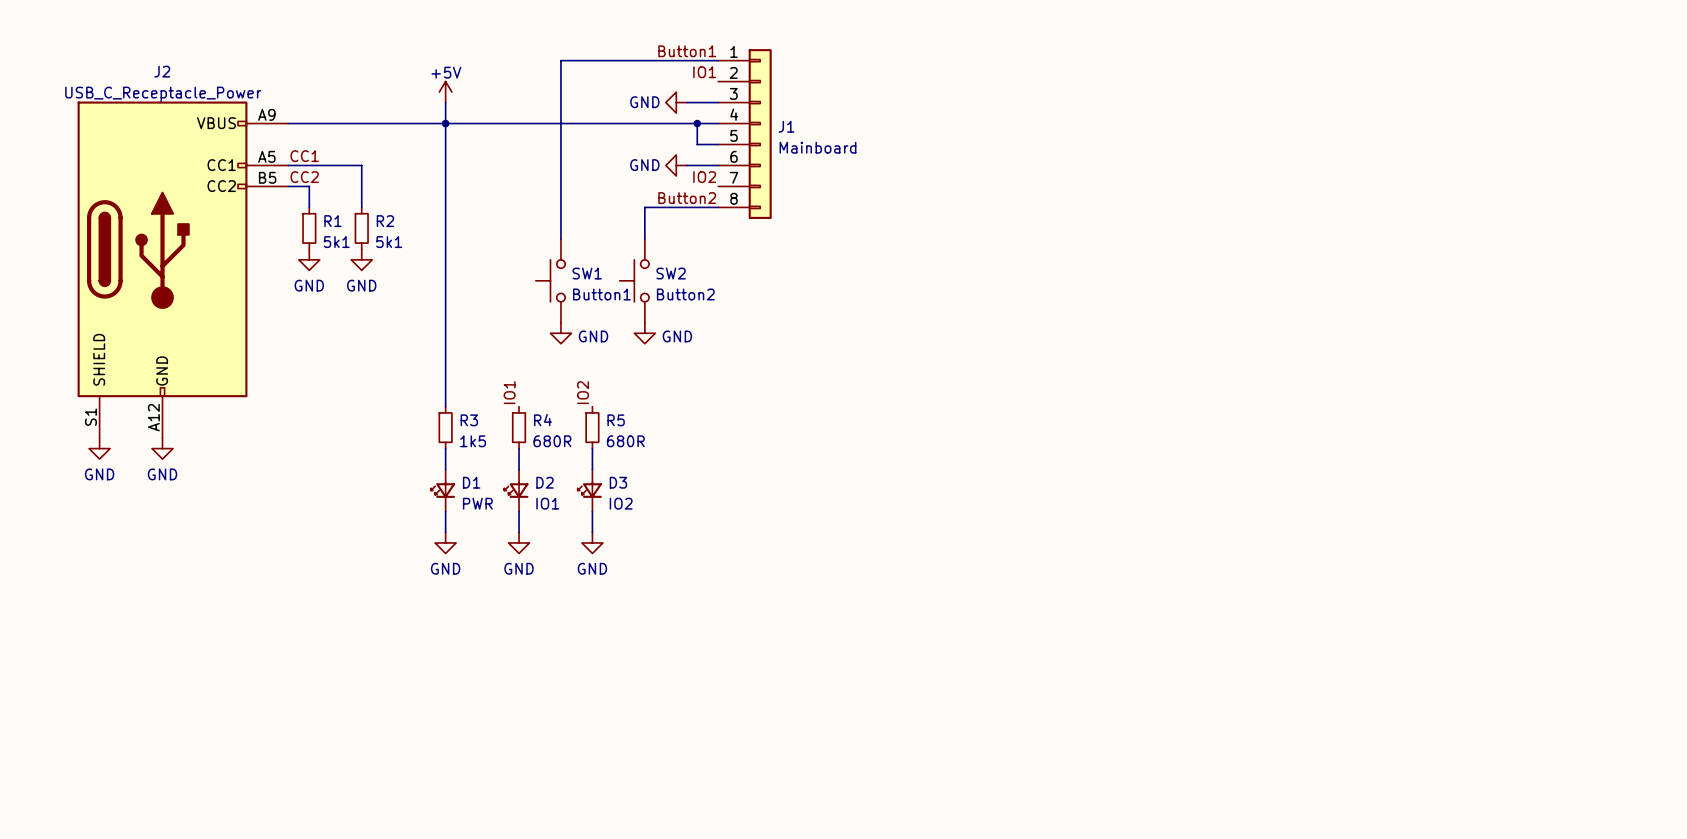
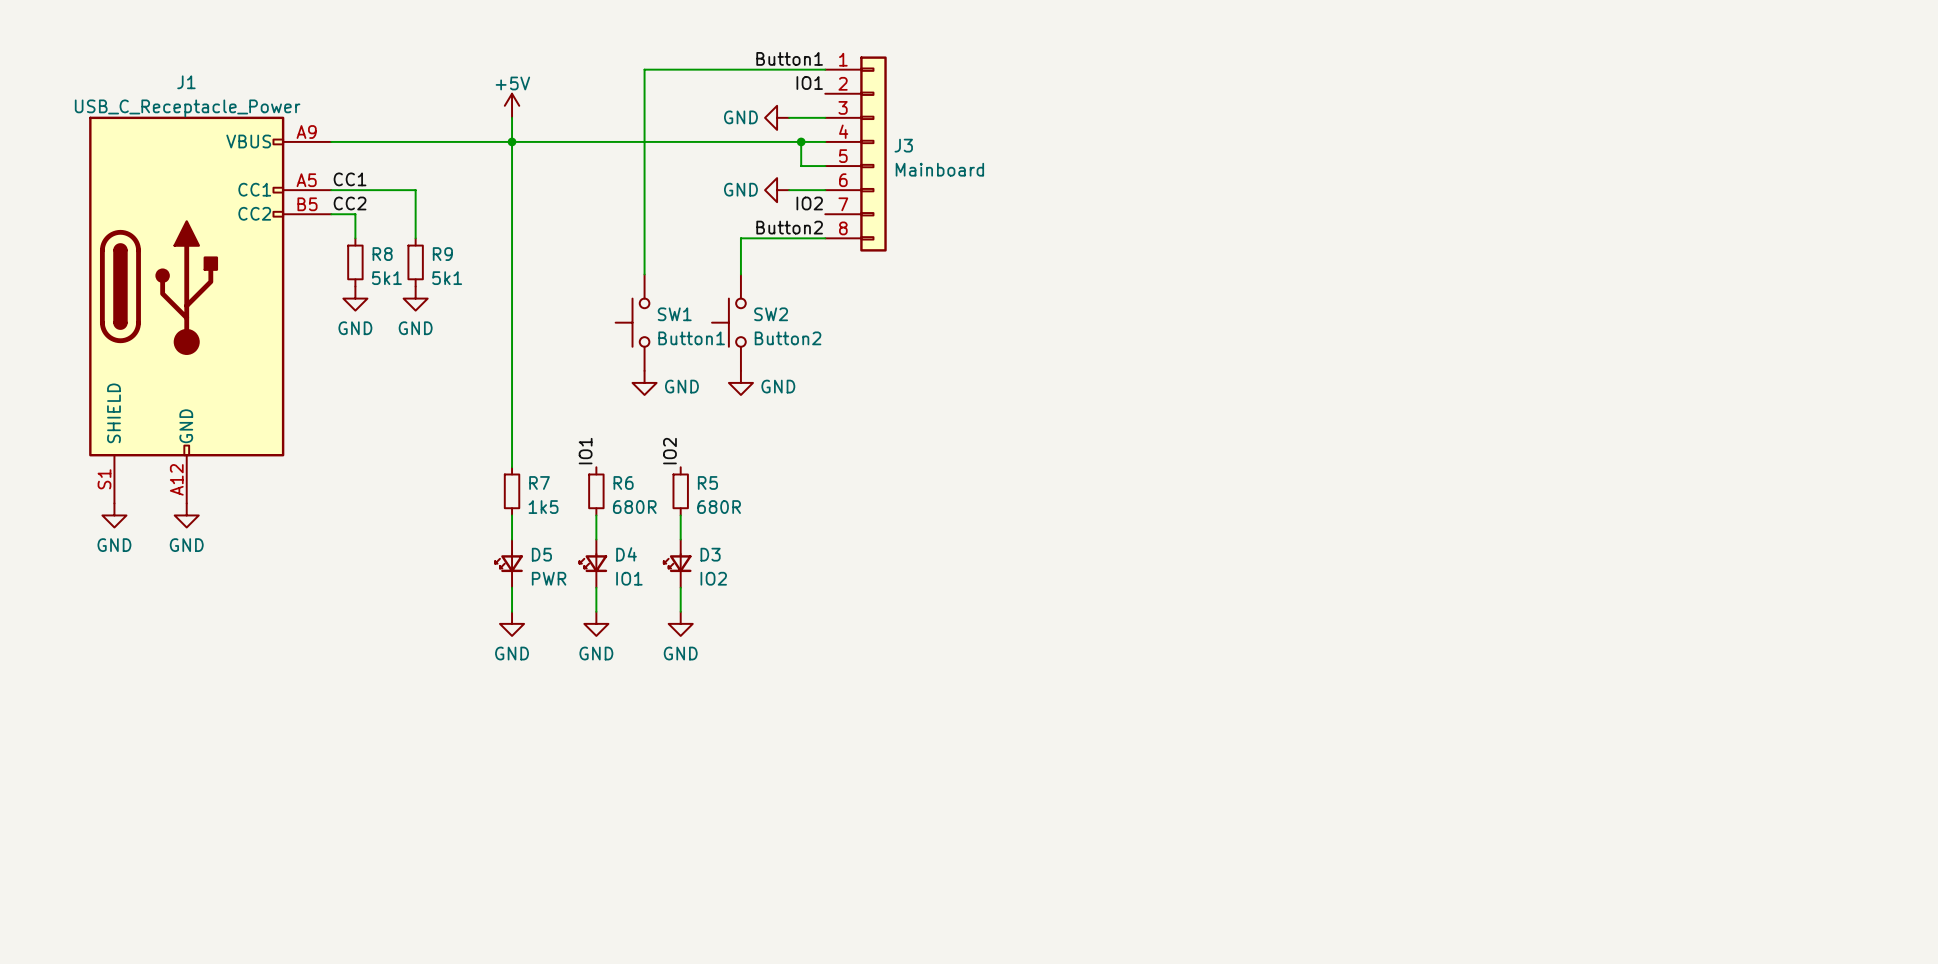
J2 name: J2 (162, 71) -> J1 (186, 82)
J1 name: J1 (786, 126) -> J3 (903, 145)
R1 name: R1 (333, 221) -> R8 (382, 254)
R2 name: R2 (385, 221) -> R9 (442, 254)
R3 name: R3 (469, 420) -> R7 (539, 482)
R4 name: R4 (542, 420) -> R6 (623, 482)
D1 name: D1 (471, 482) -> D5 (541, 554)
D2 name: D2 (545, 482) -> D4 (626, 554)

